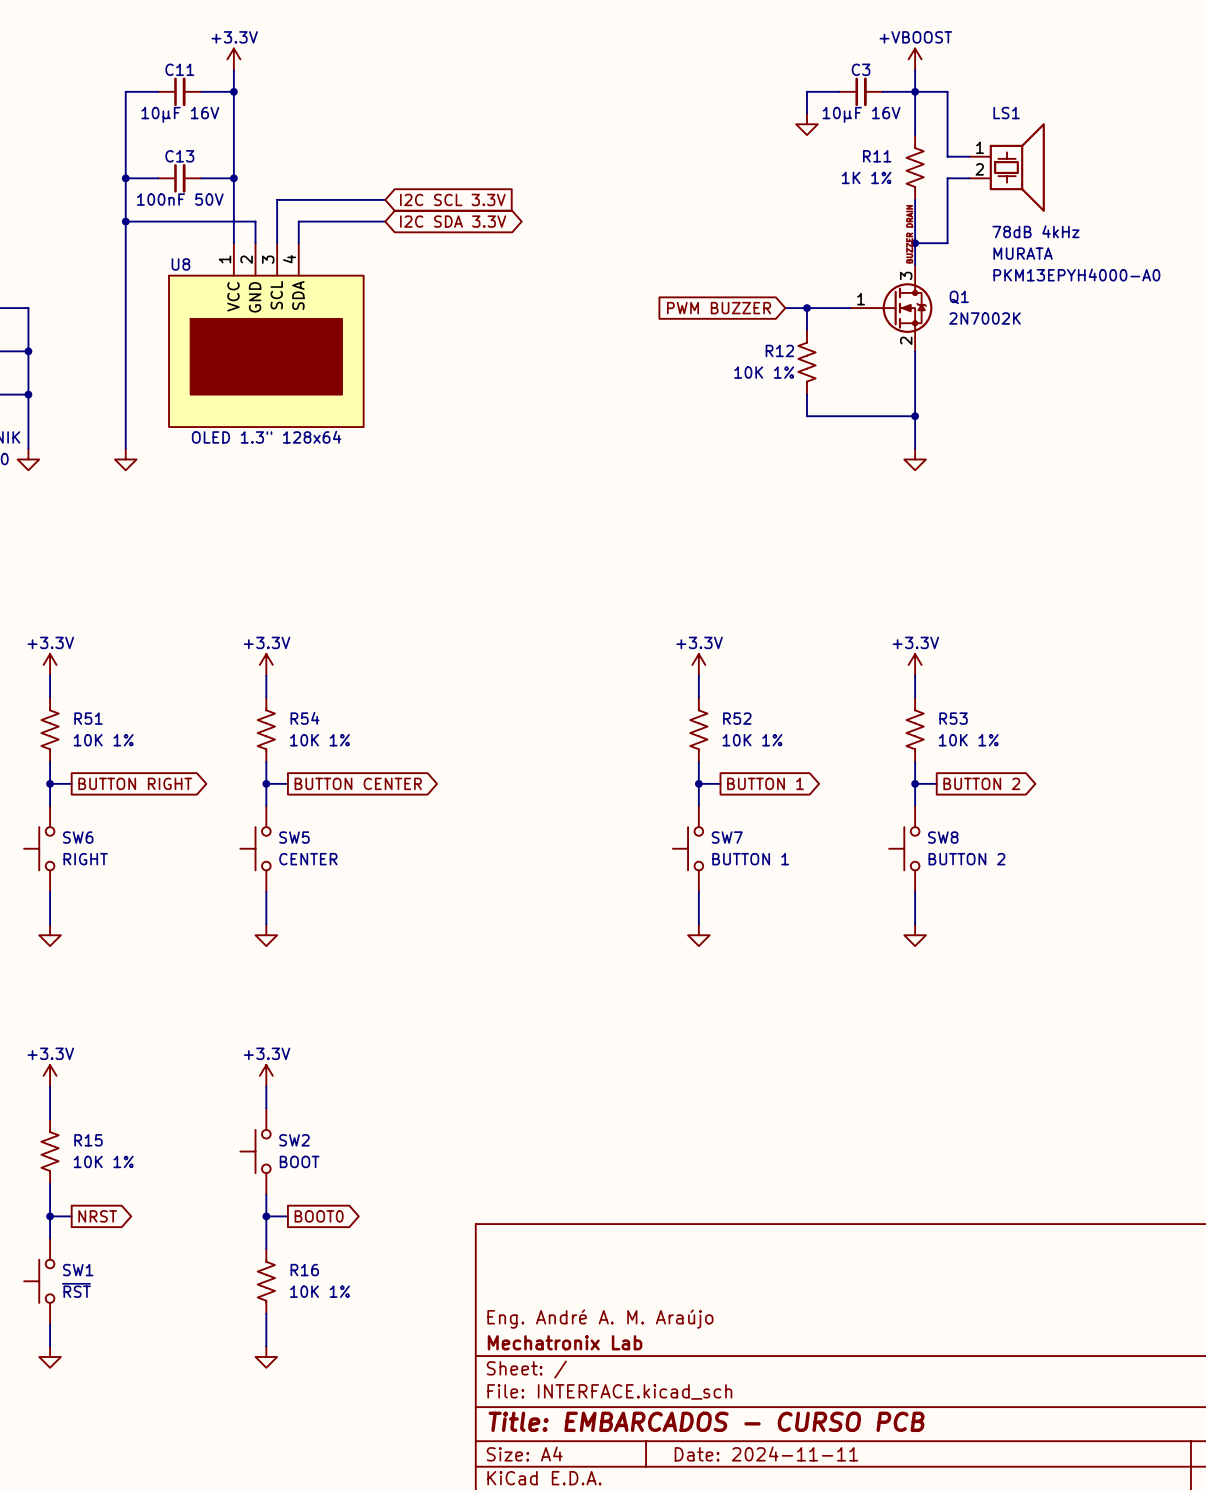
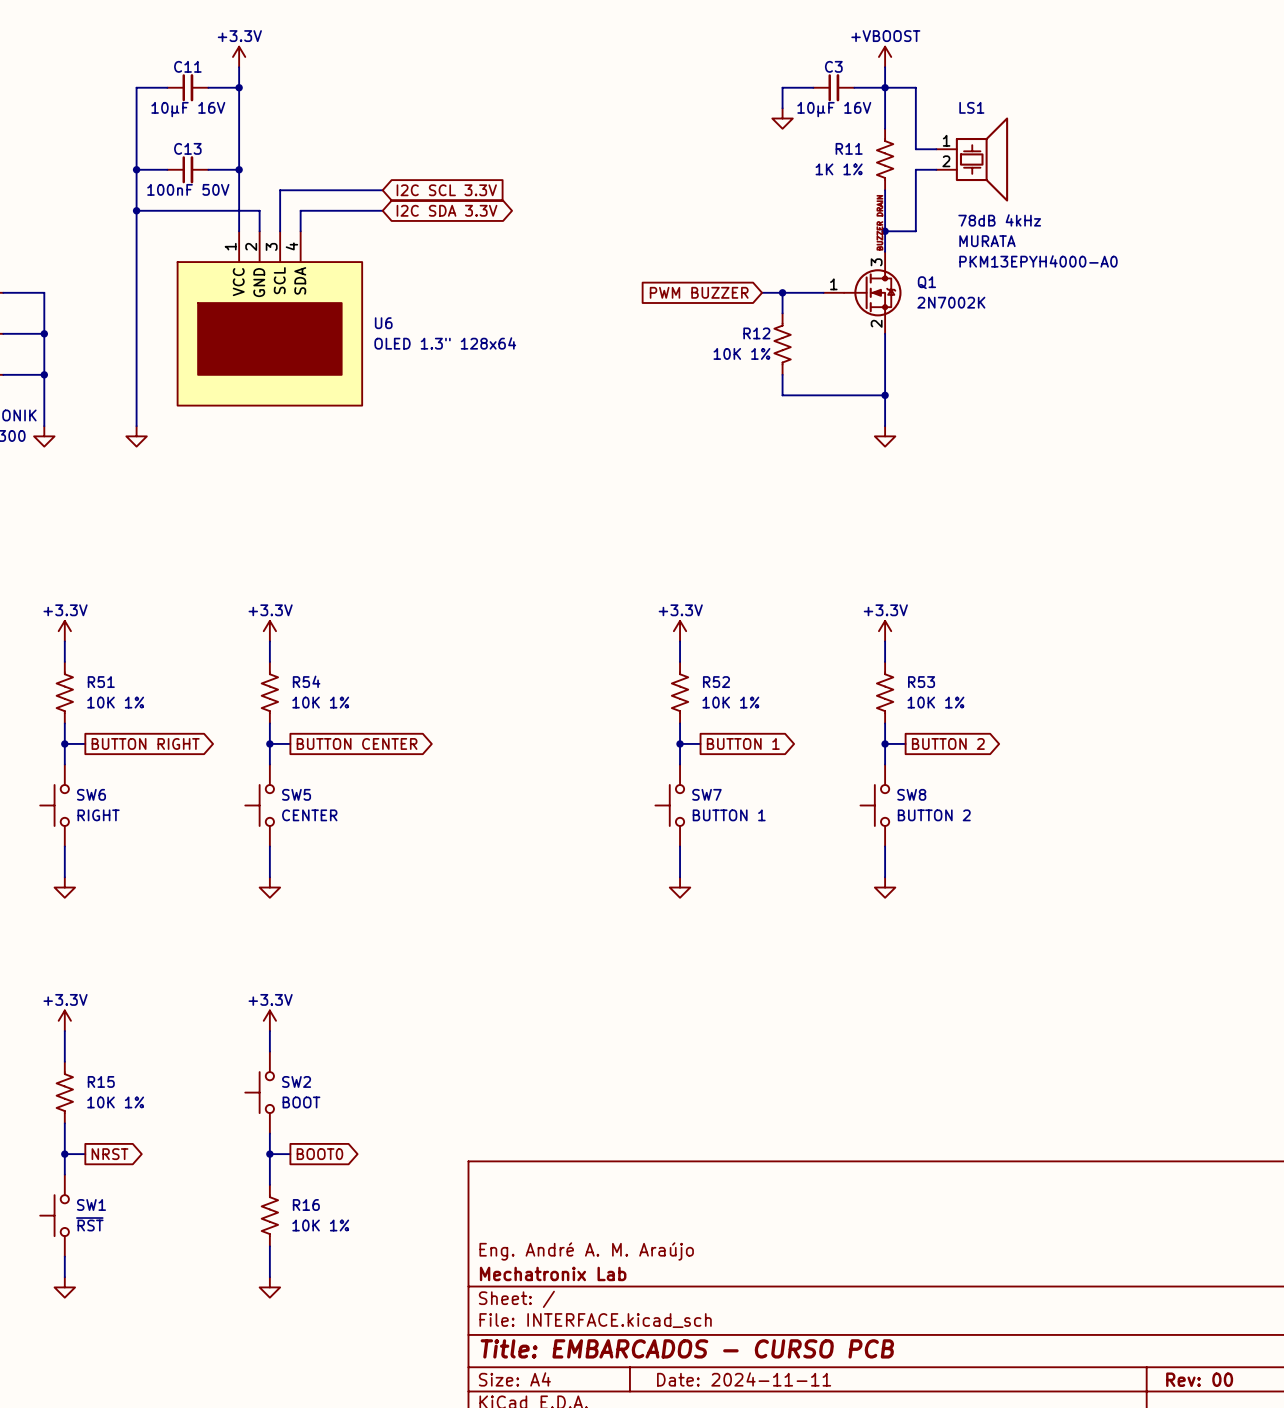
U8 name: U8 (180, 264) -> U6 (383, 323)
U8 value position: OLED 1.3" 128x64 (266, 437) -> OLED 1.3" 128x64 (445, 343)

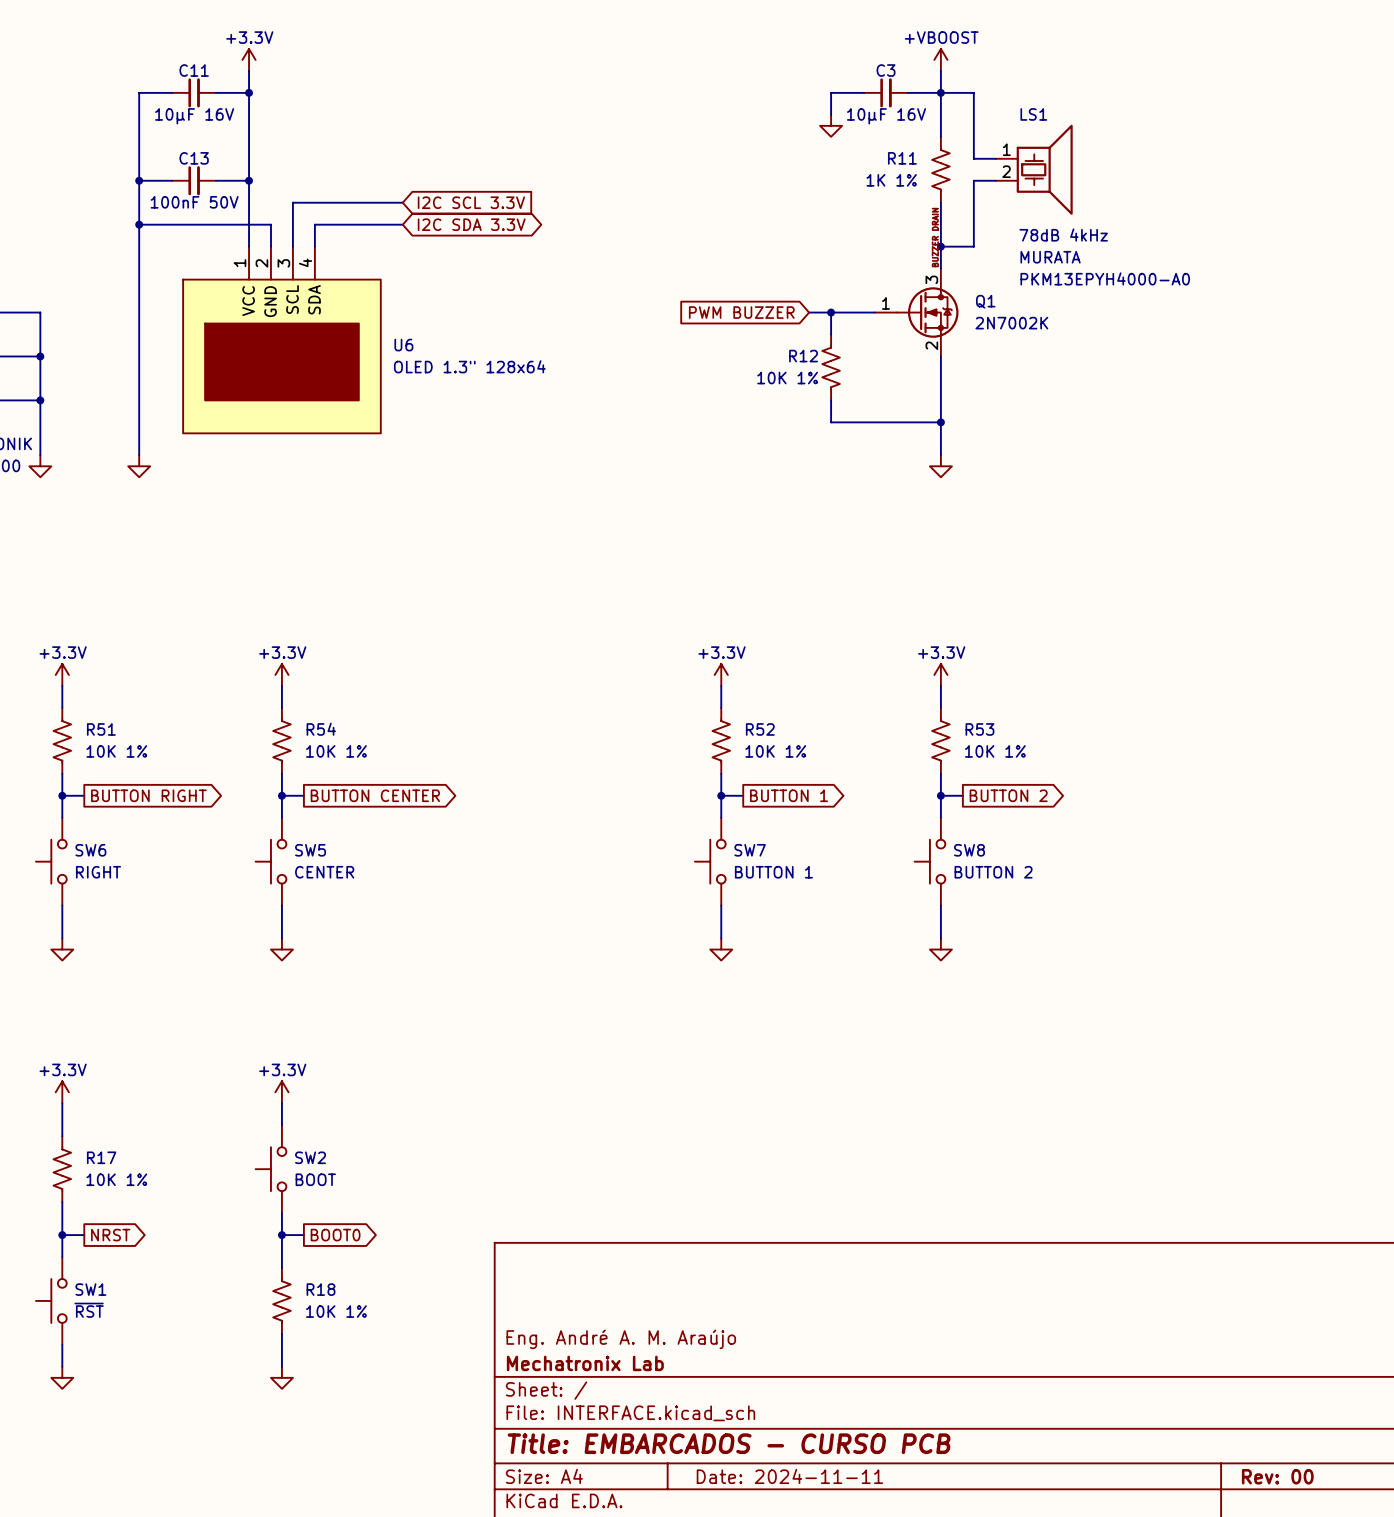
R15 name: R15 (101, 1081) -> R17 (101, 1157)
R16 name: R16 (306, 1205) -> R18 (321, 1289)

